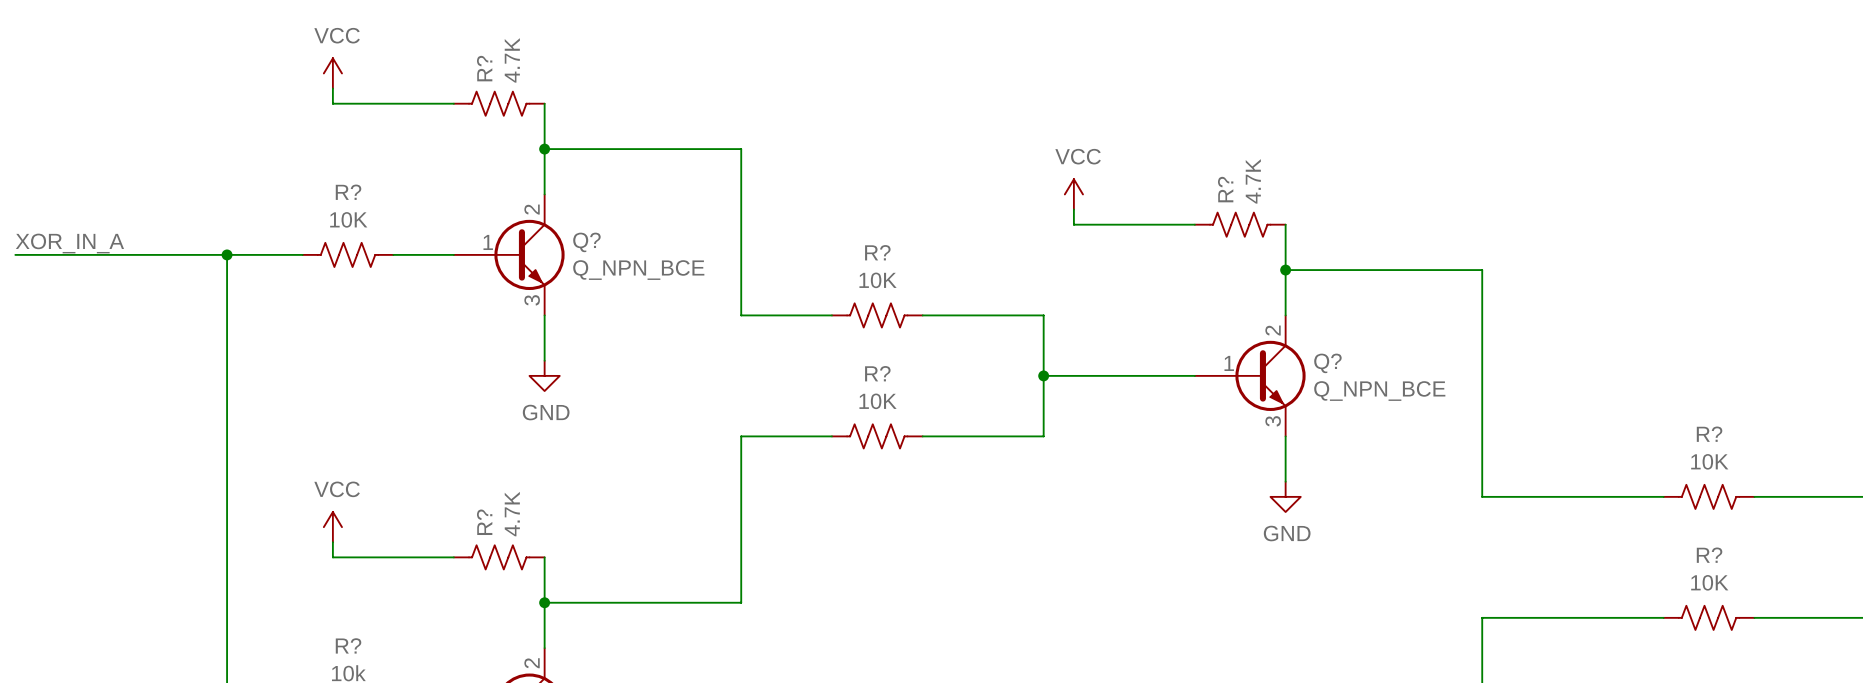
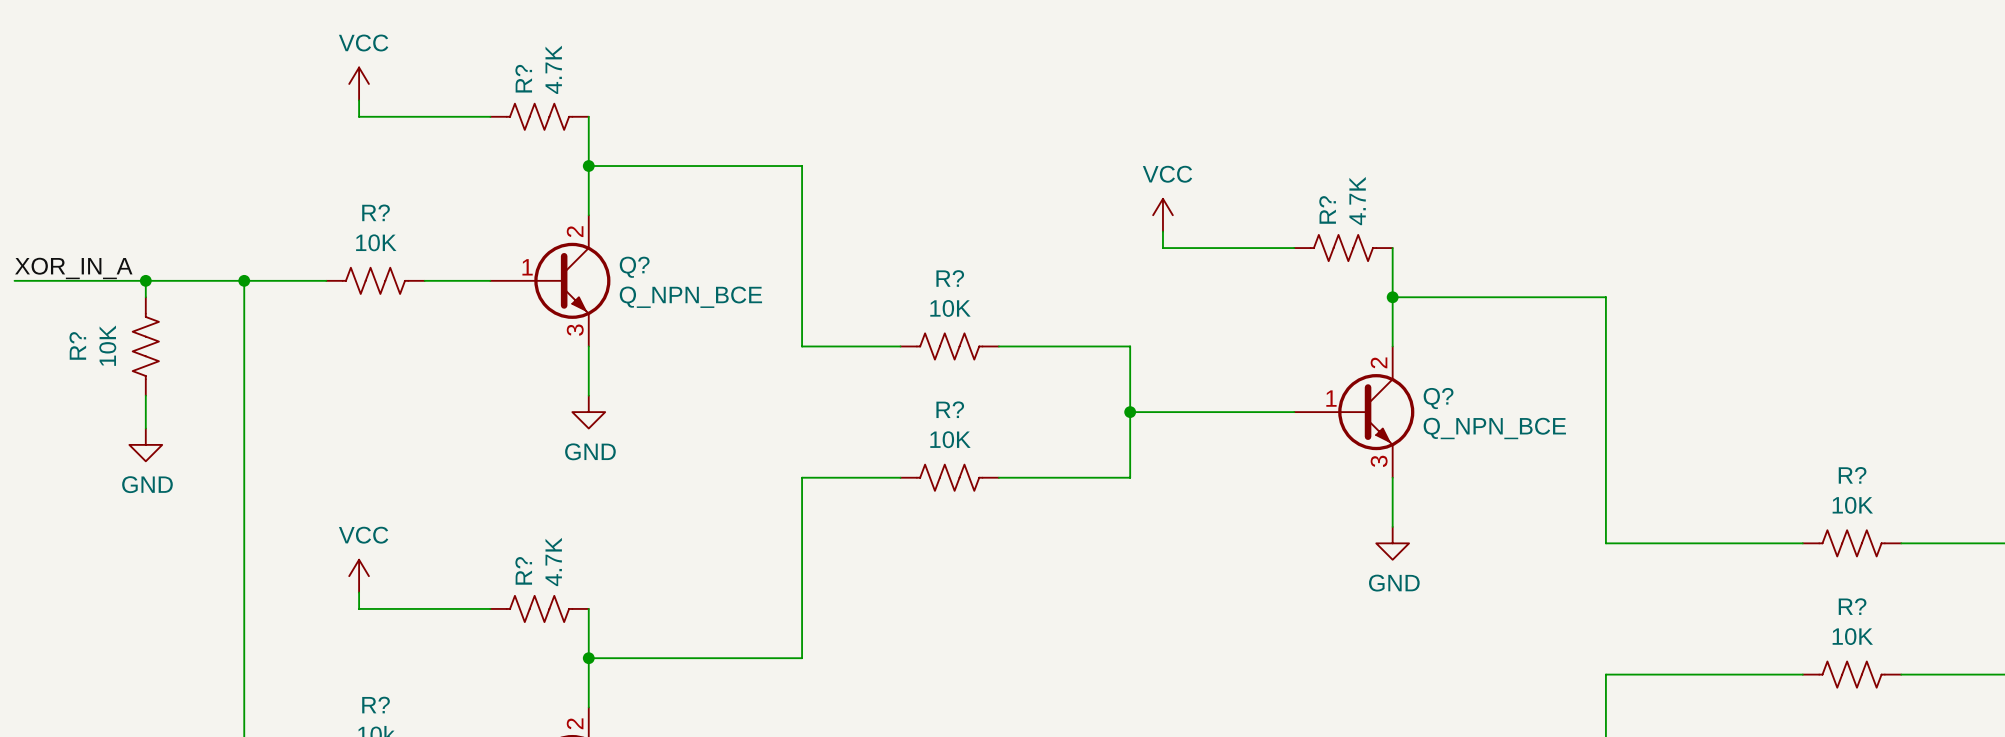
wire: none -> (145, 280) (145, 297)
junction: none -> (145, 280)
R?: none -> 10K (145, 346)
wire: none -> (145, 395) (145, 428)
power symbol: none -> GND (145, 444)

